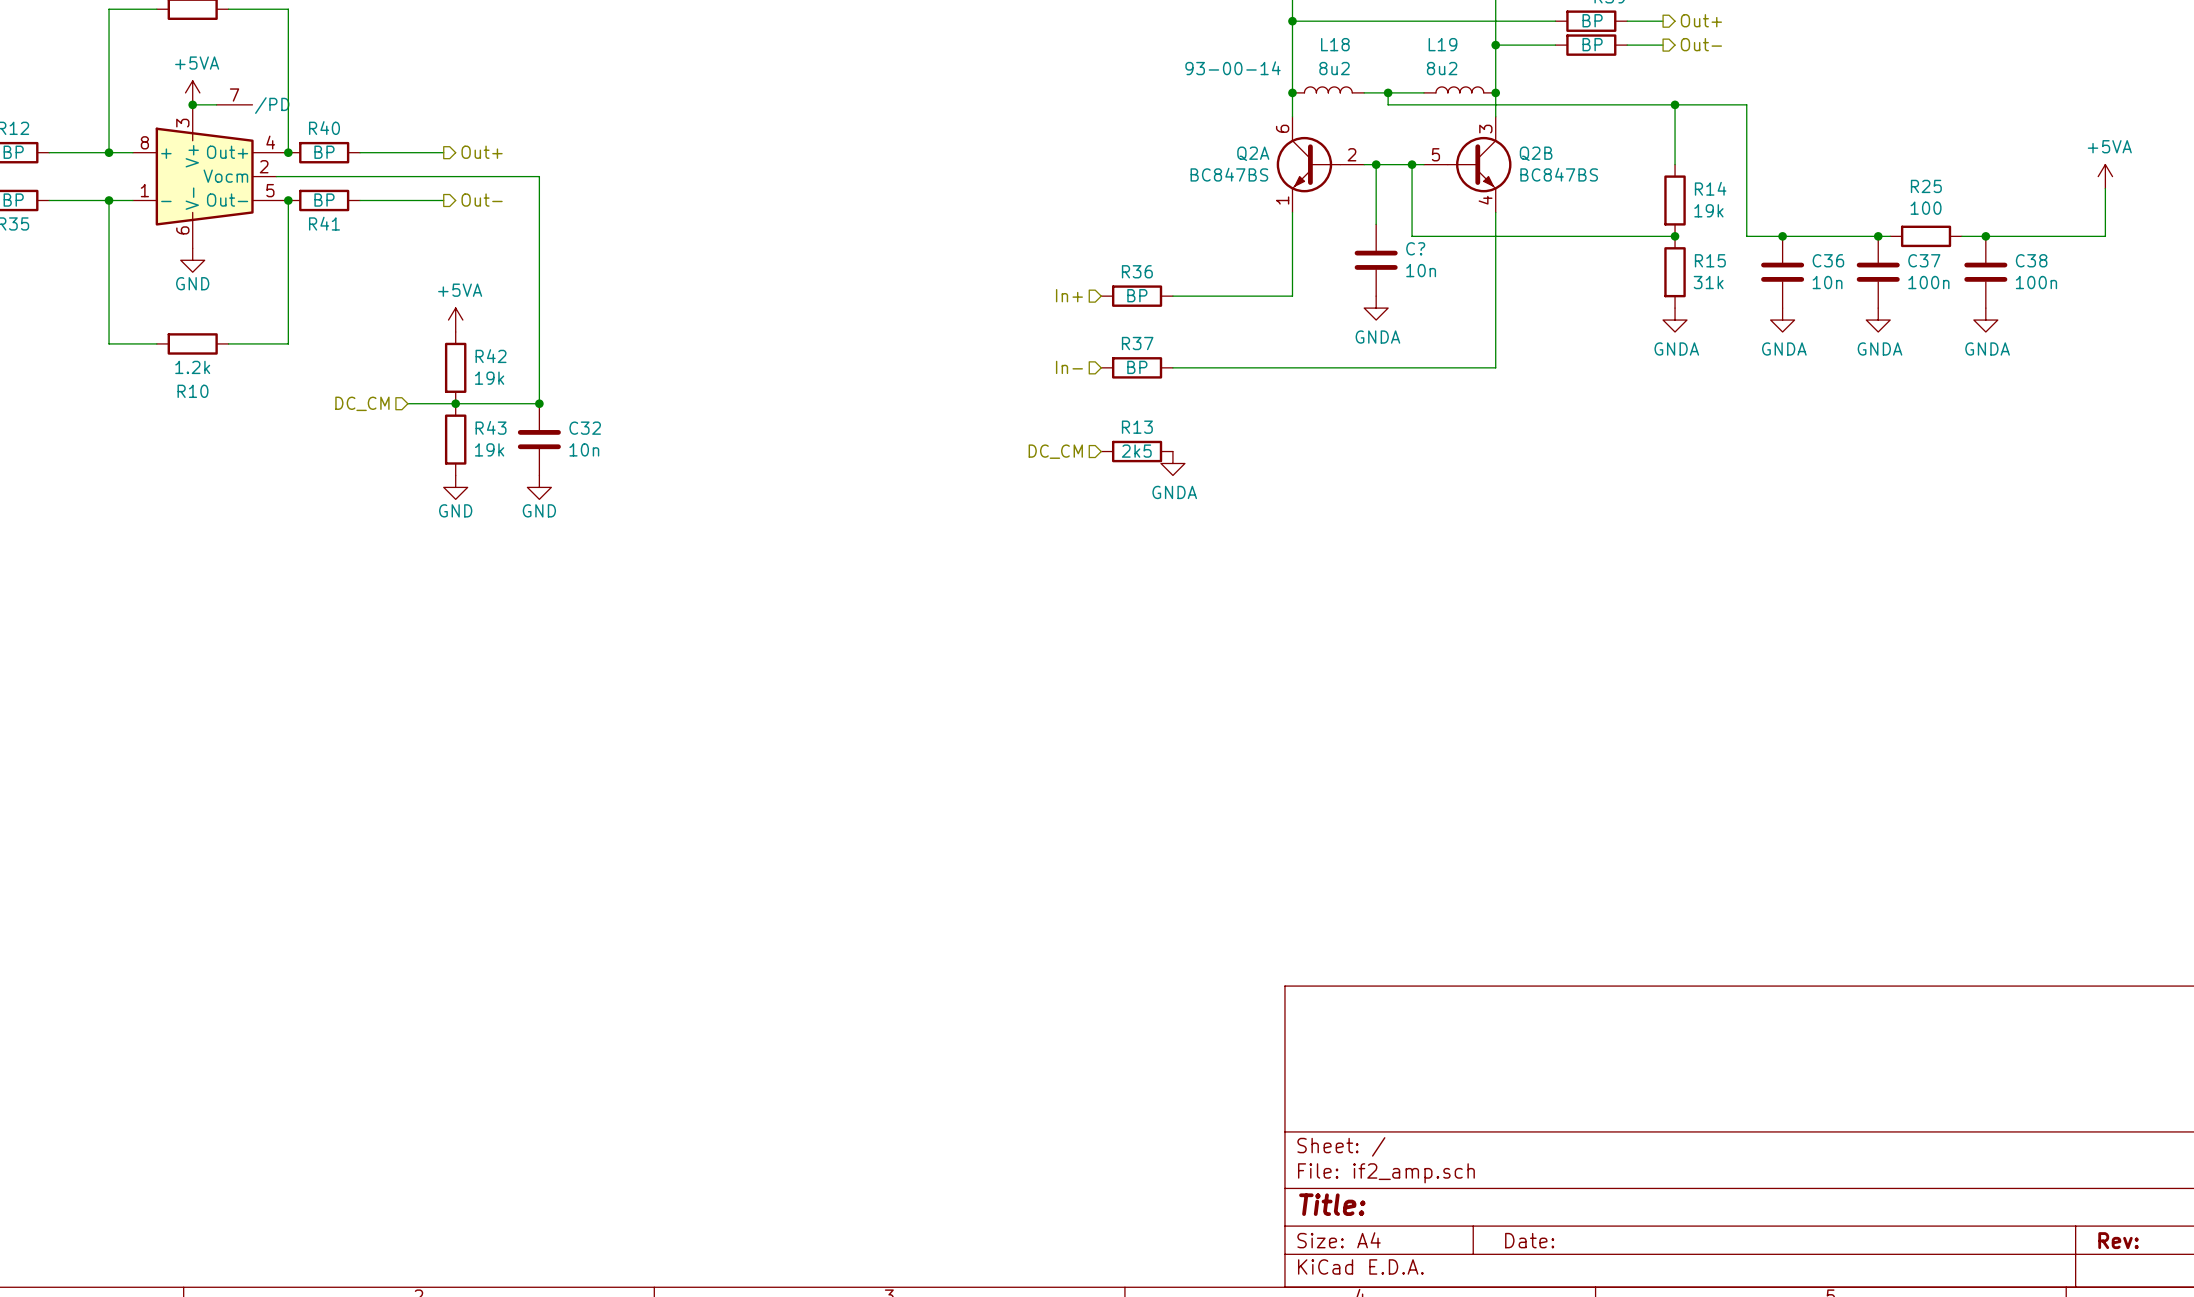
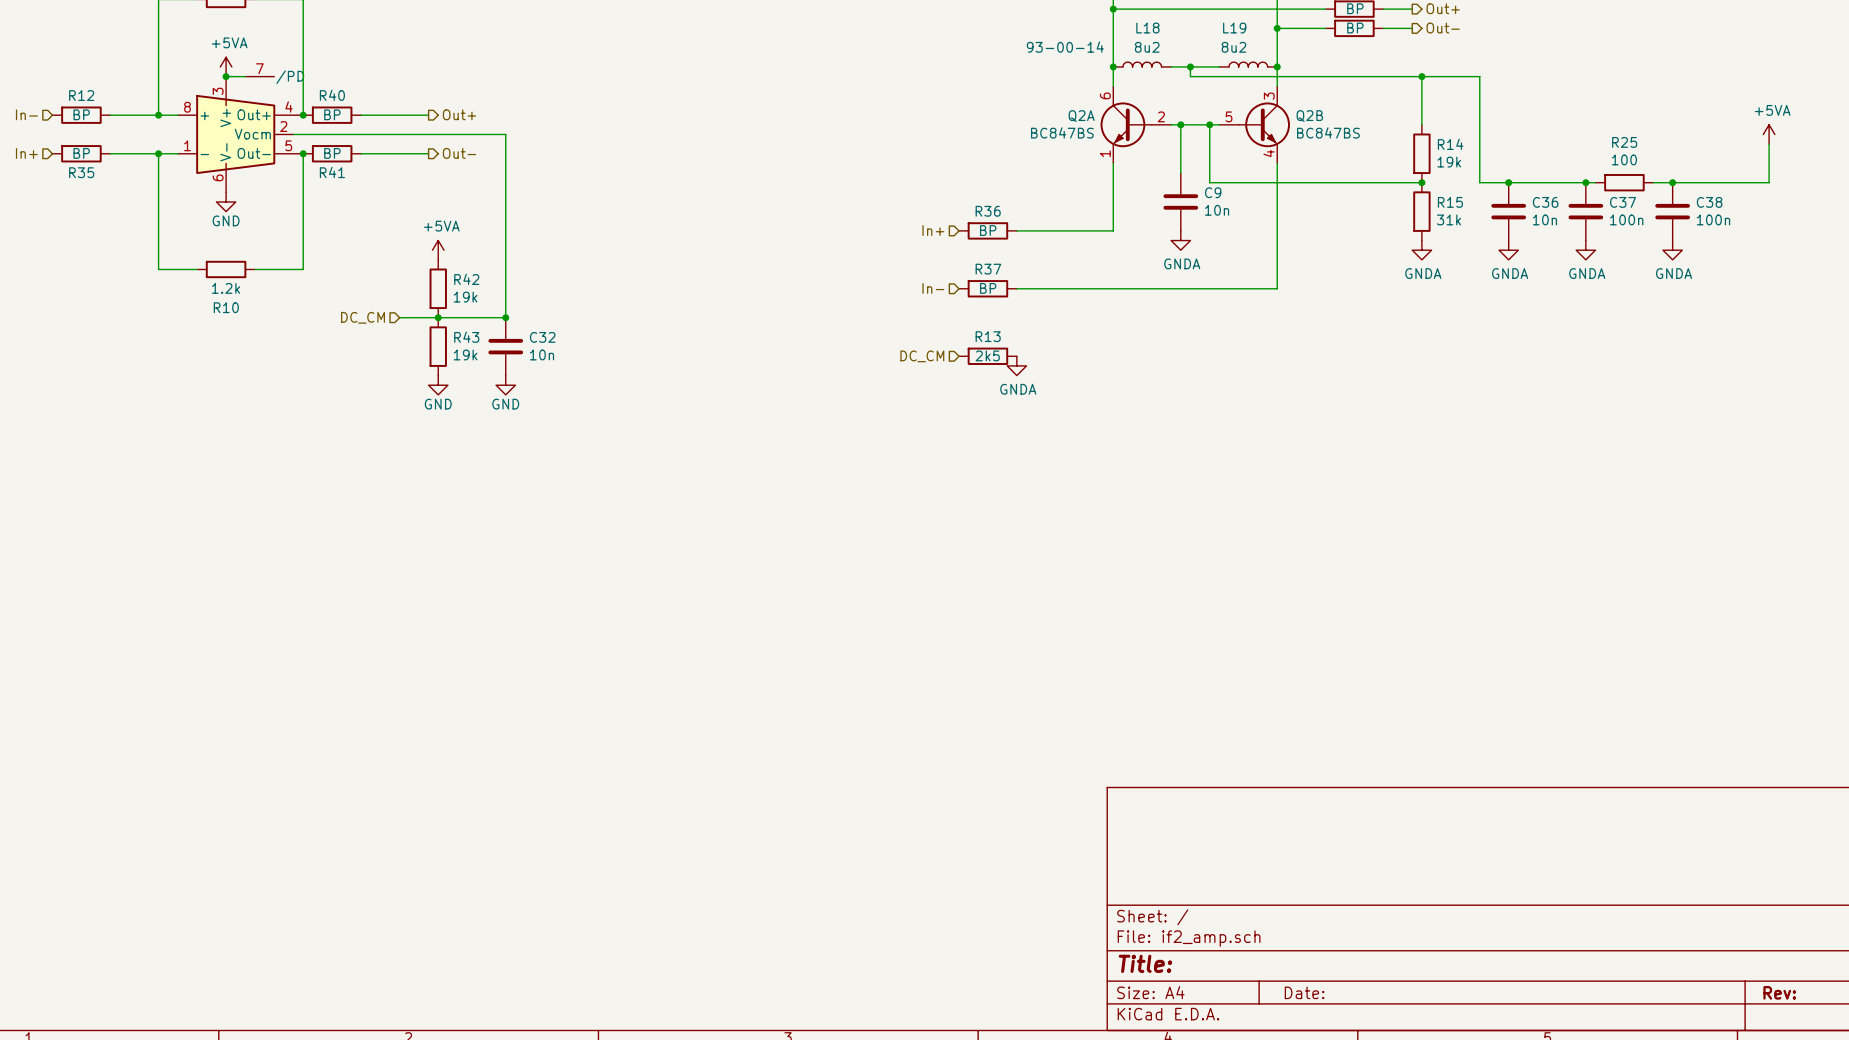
C? name: C? (1415, 248) -> C9 (1213, 192)

